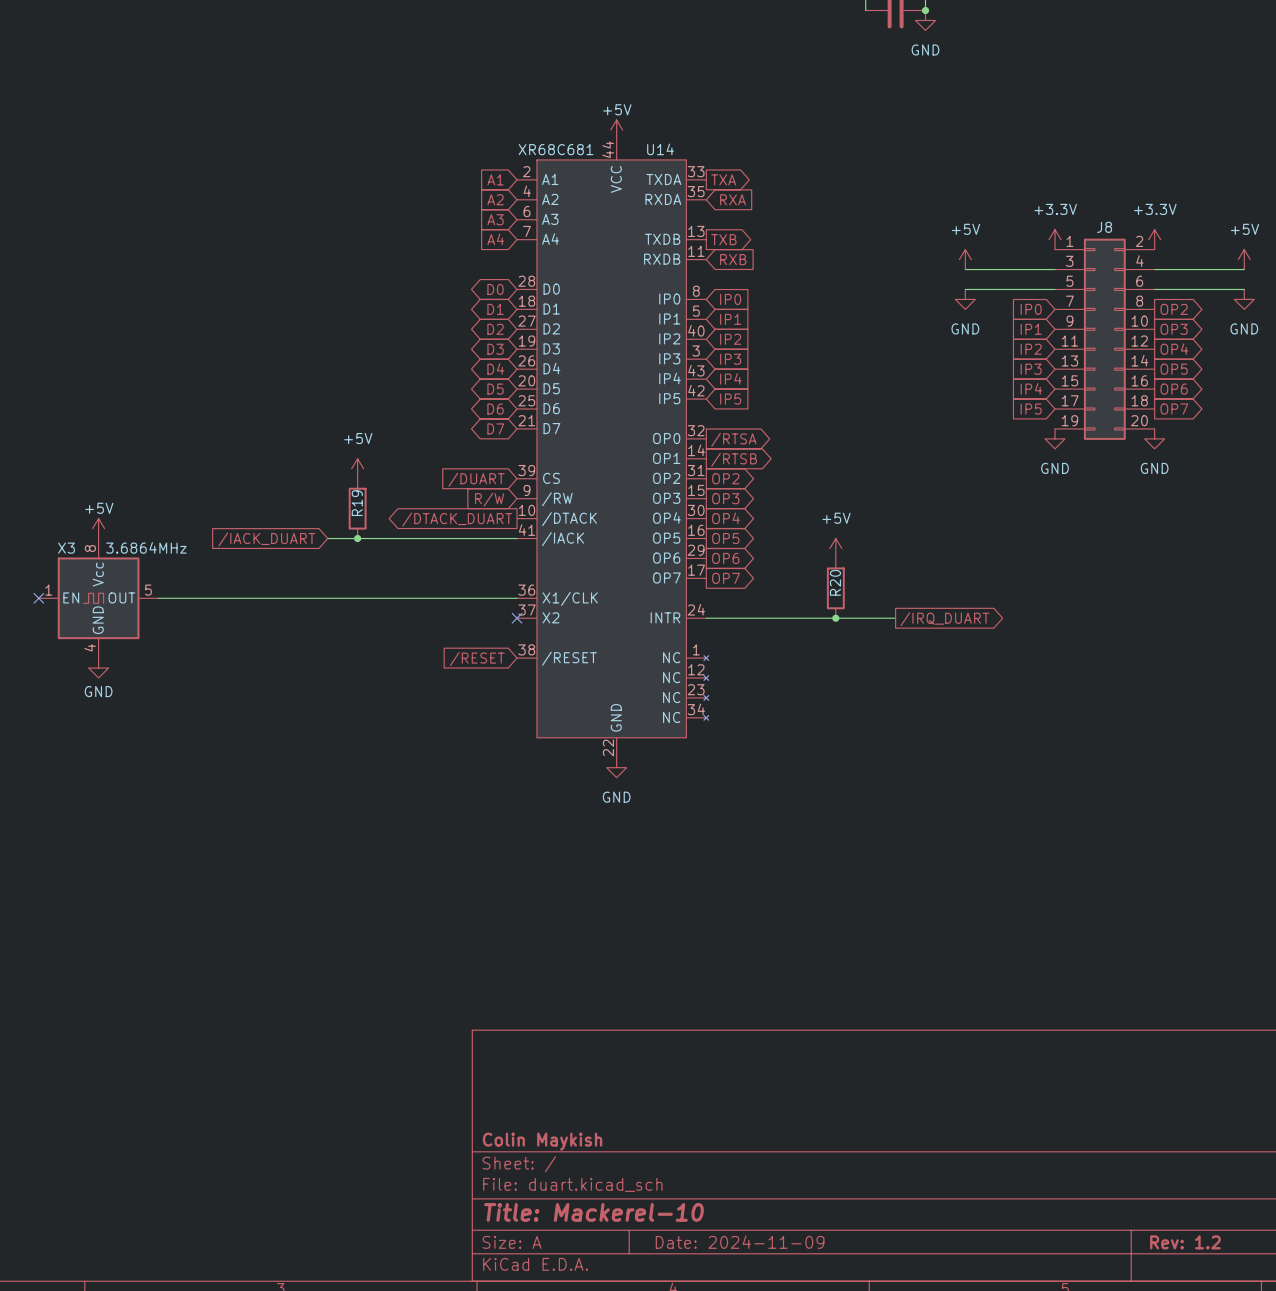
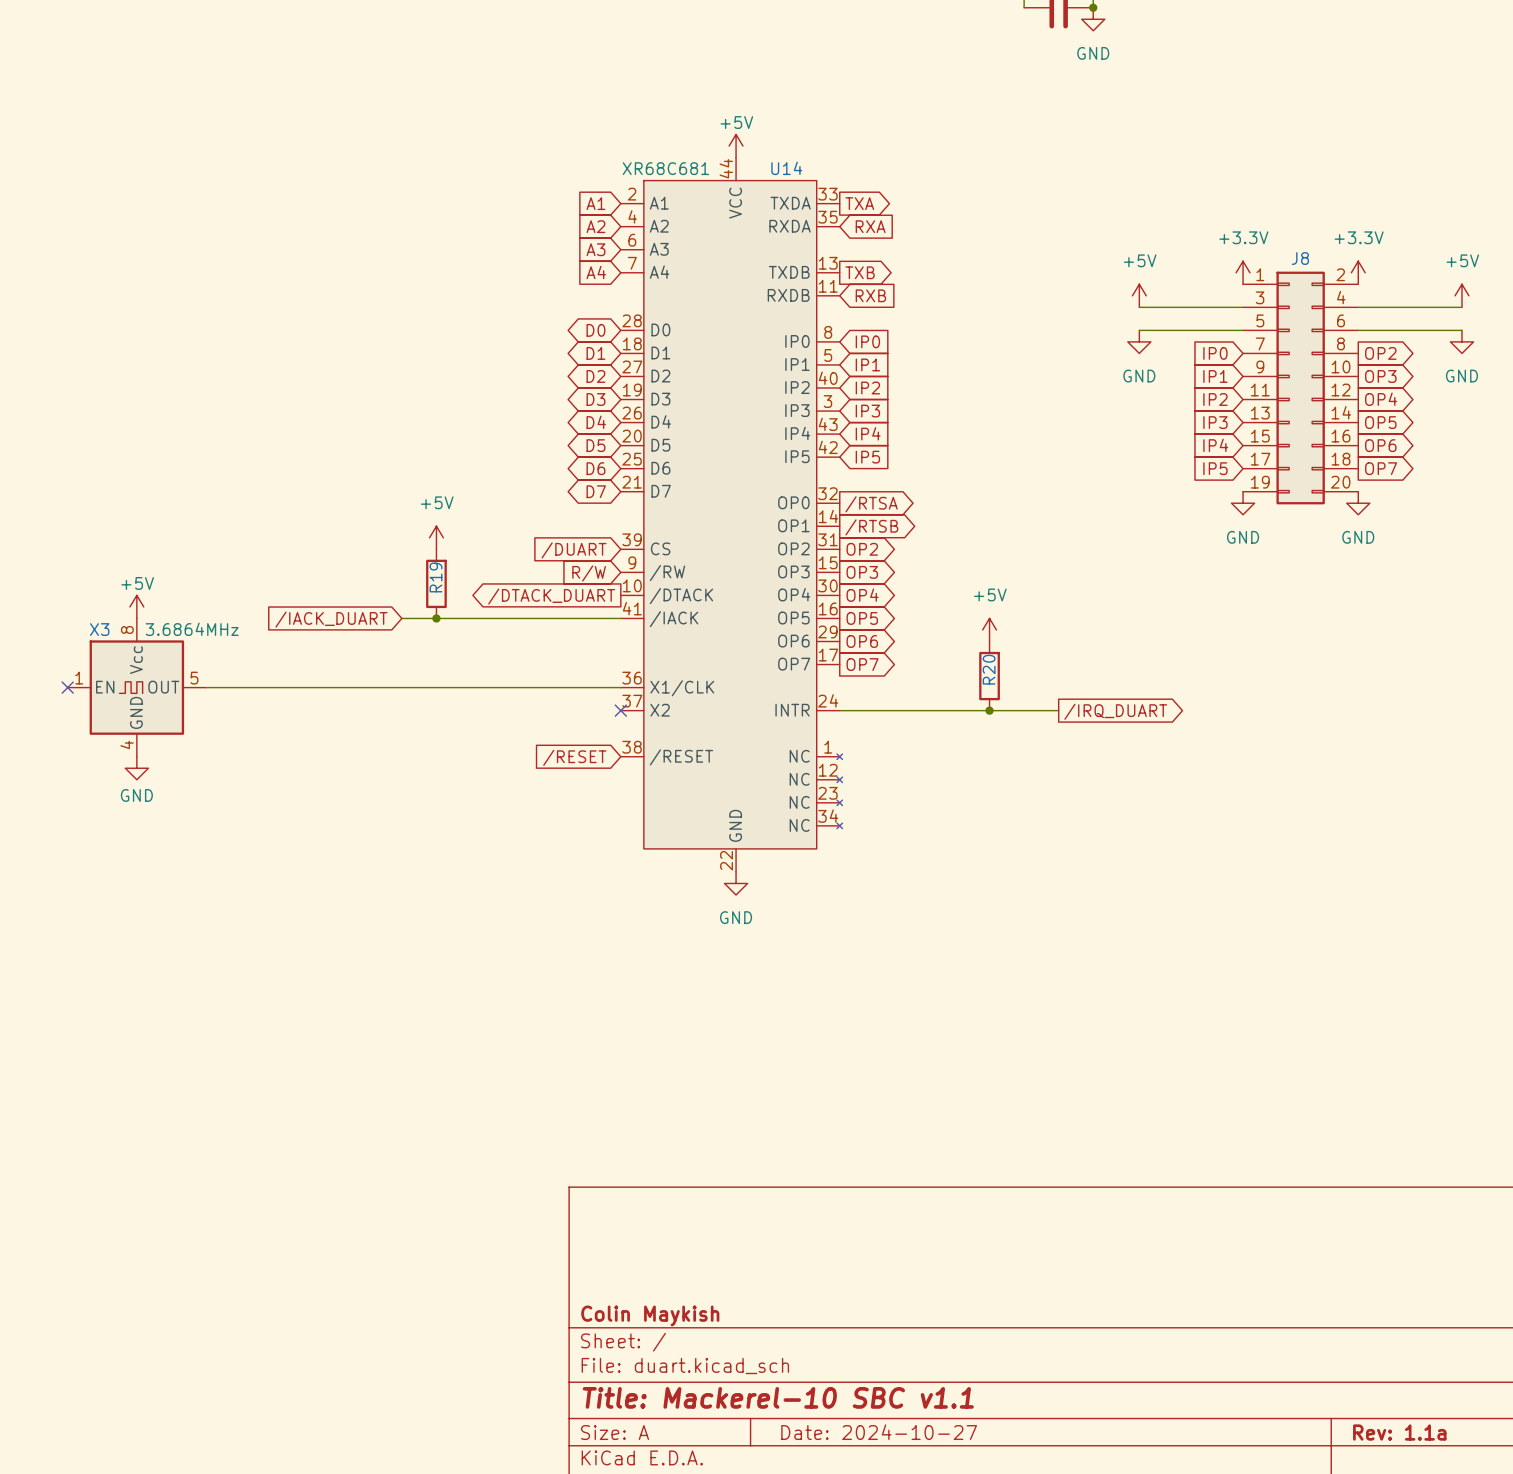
title block: Title: Mackerel-10 (594, 1212) -> Title: Mackerel-10 SBC v1.1 (778, 1397)
title block: Date: 2024-11-09 (740, 1242) -> Date: 2024-10-27 (879, 1432)
title block: Rev: 1.2 (1185, 1242) -> Rev: 1.1a (1399, 1432)

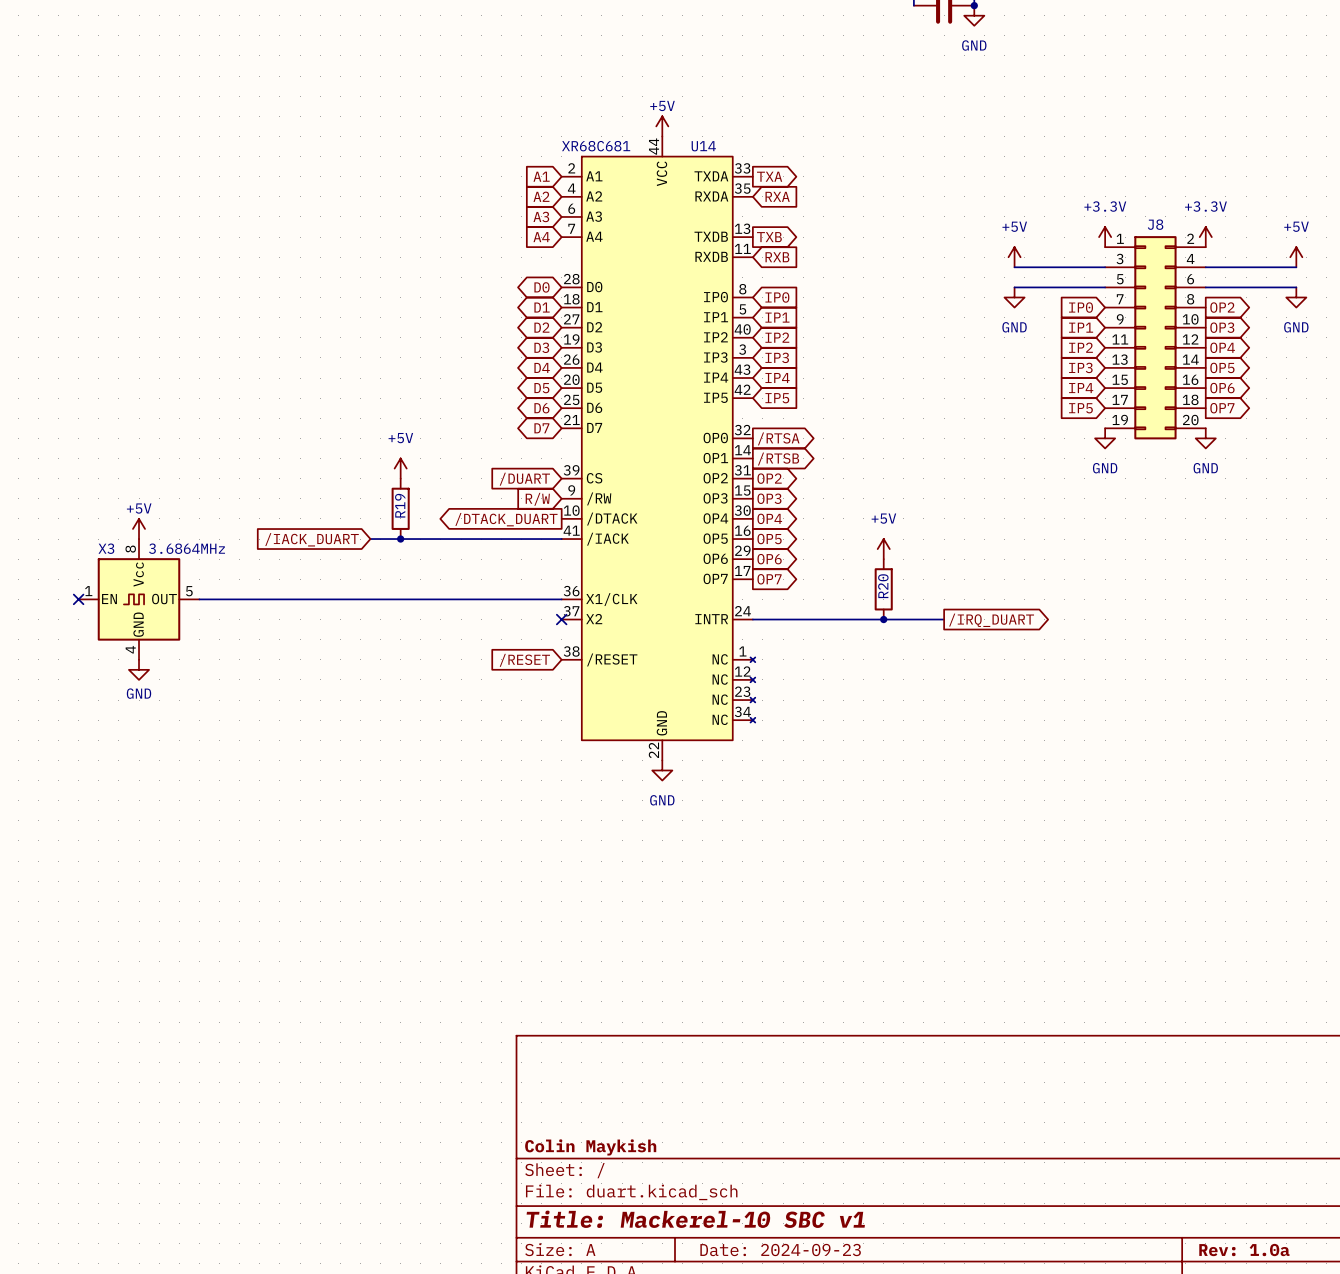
title block: Title: Mackerel-10 SBC v1.1 (778, 1397) -> Title: Mackerel-10 SBC v1 (695, 1219)
title block: Date: 2024-10-27 (879, 1432) -> Date: 2024-09-23 (780, 1250)
title block: Rev: 1.1a (1399, 1432) -> Rev: 1.0a (1244, 1250)

